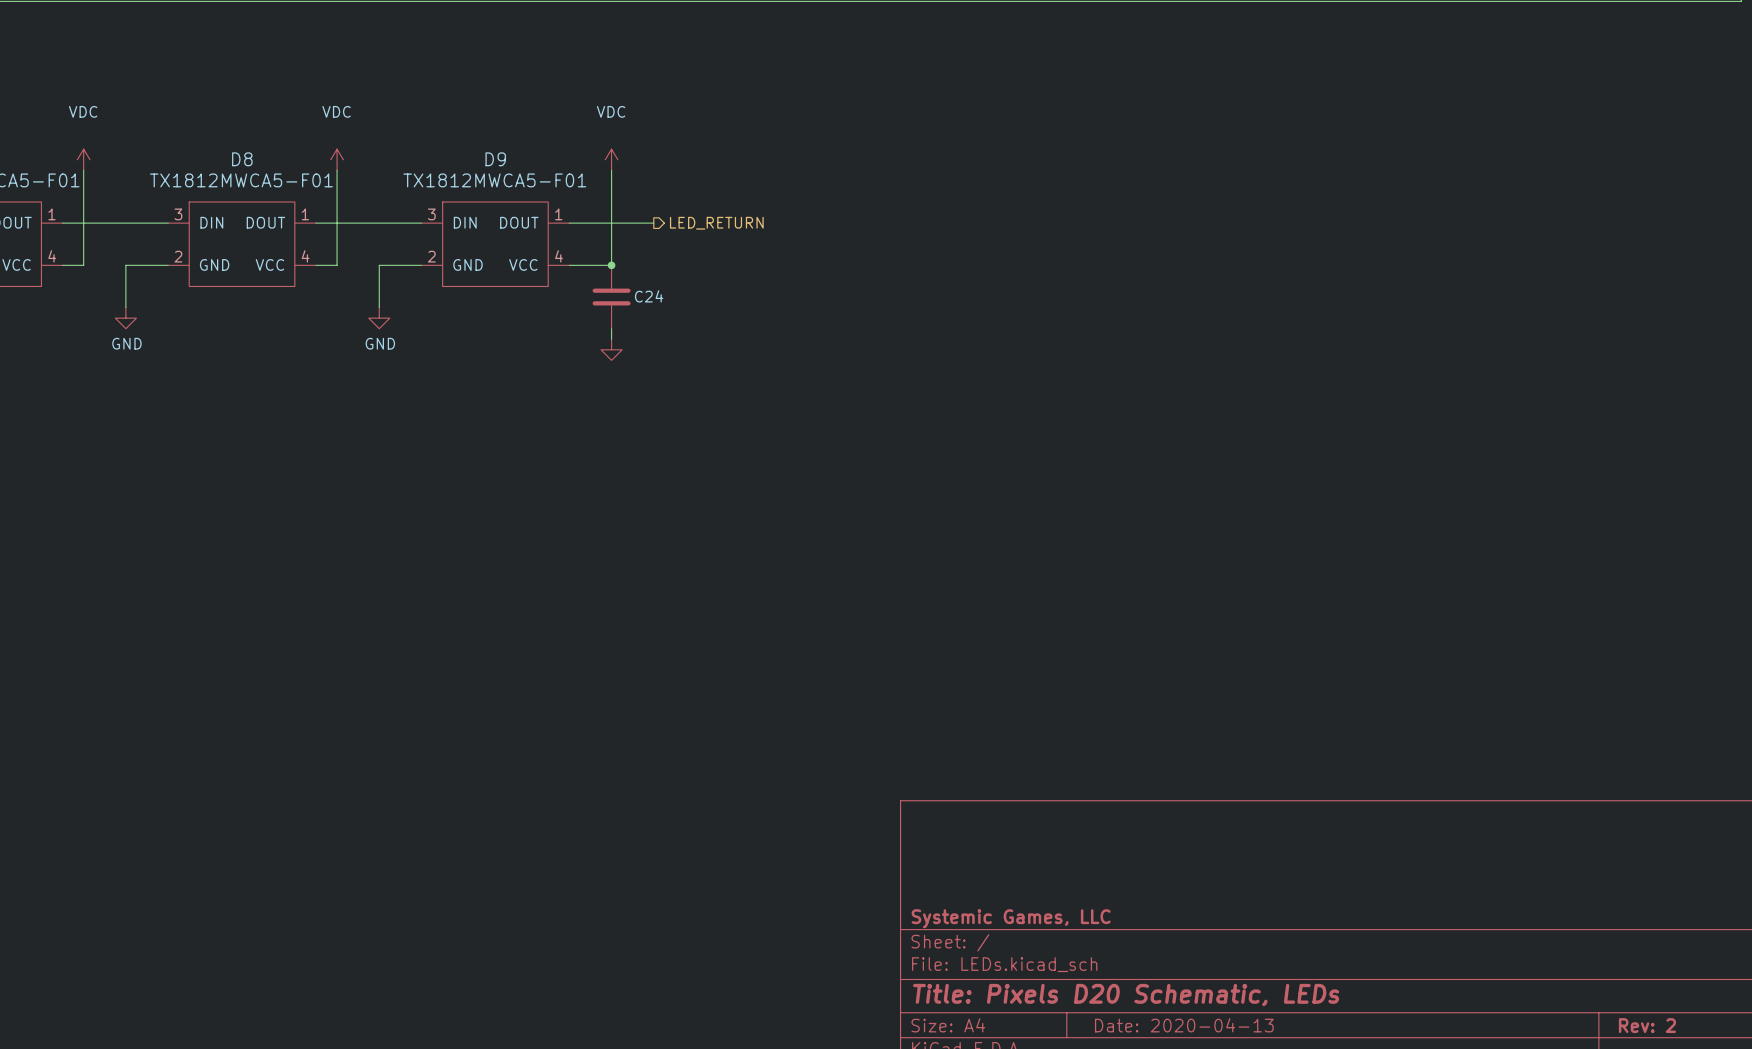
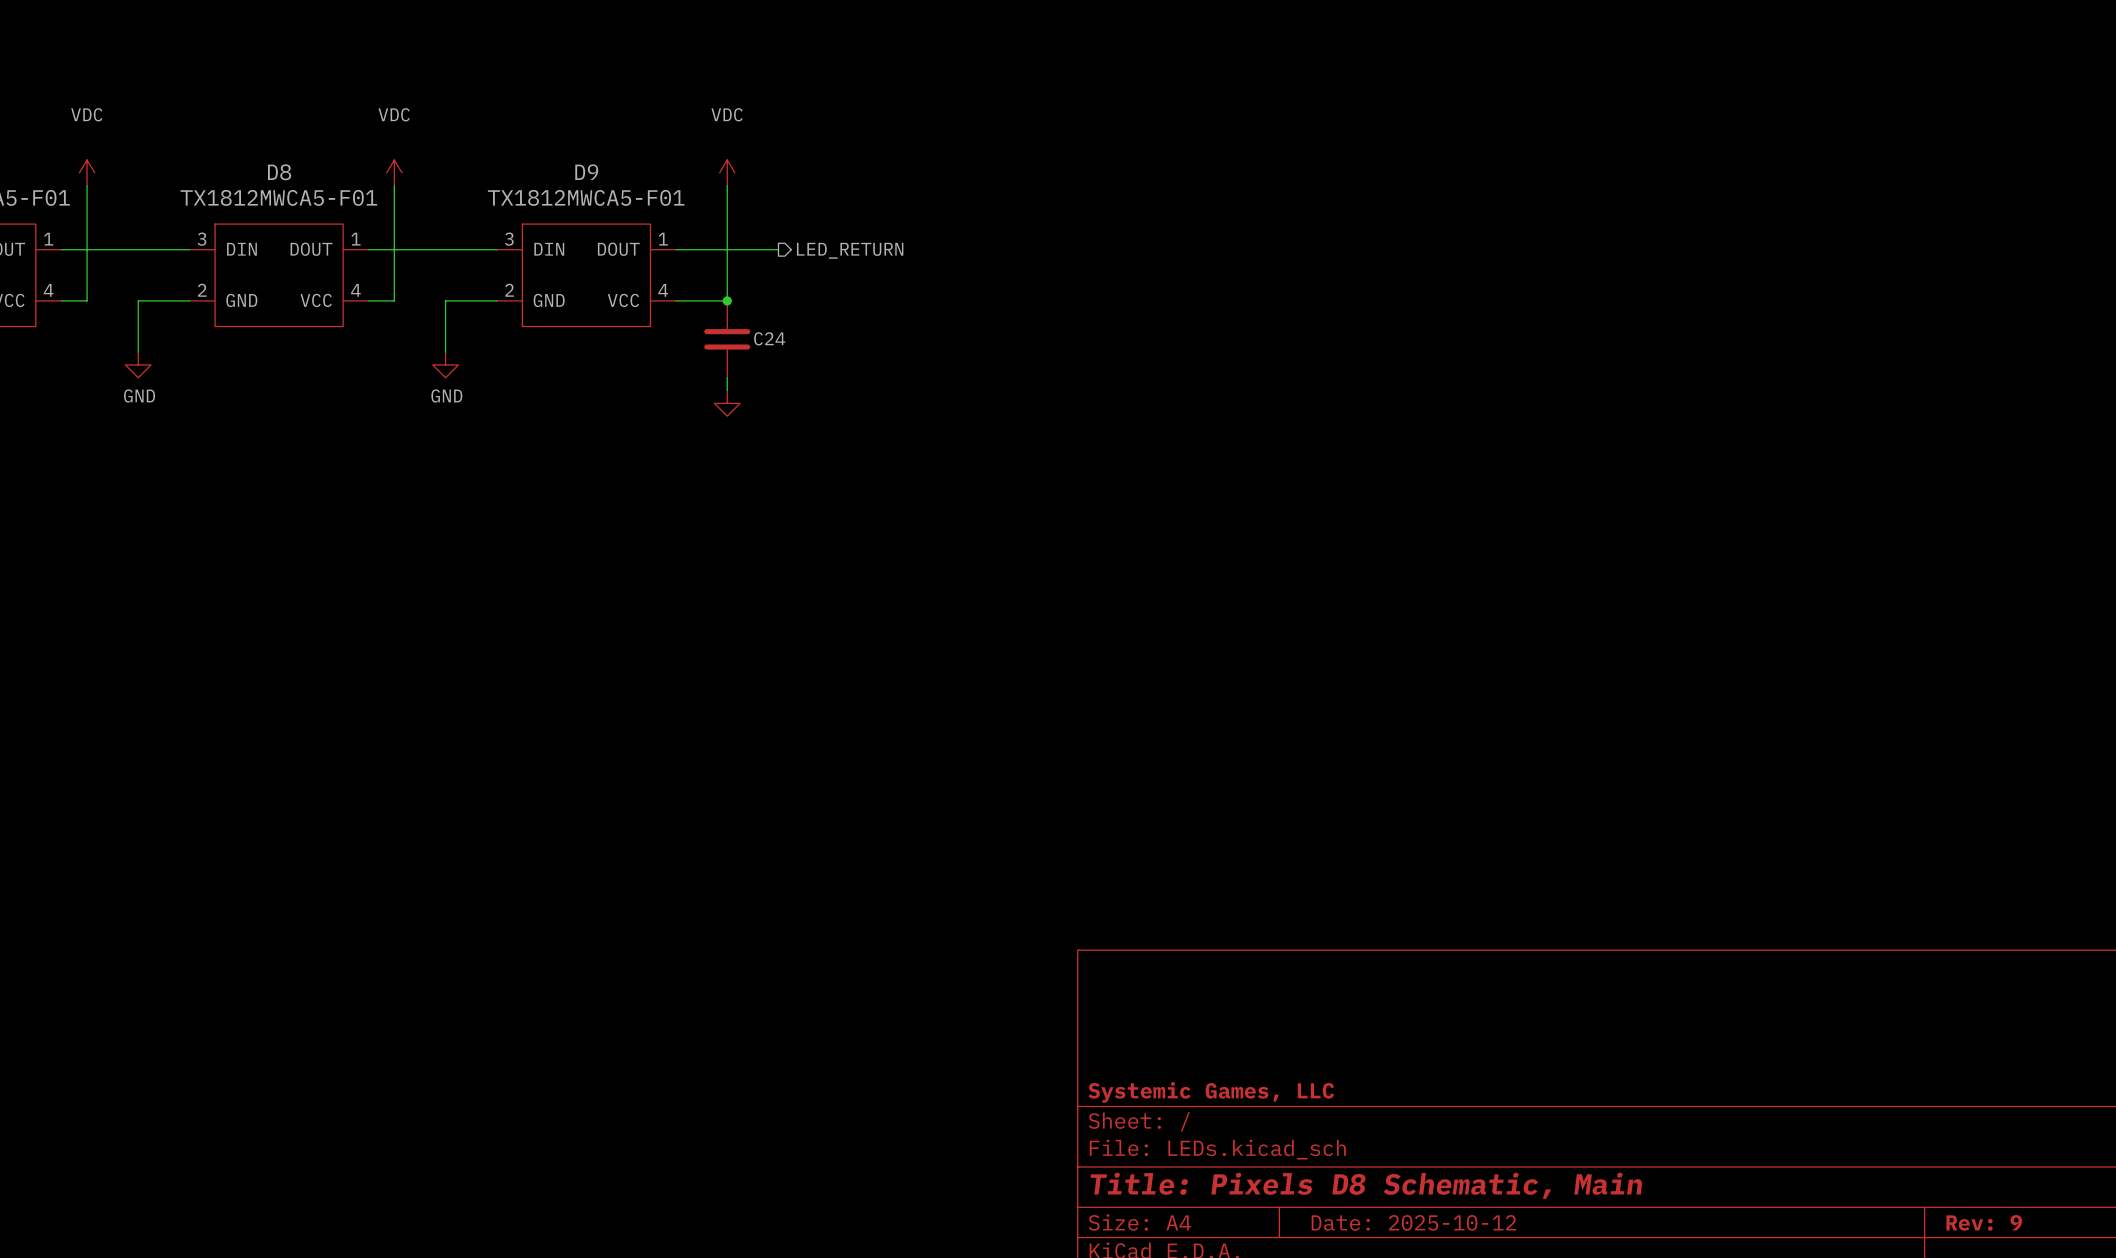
title block: Title: Pixels D20 Schematic, LEDs (1126, 995) -> Title: Pixels D8 Schematic, Main (1366, 1185)
title block: Date: 2020-04-13 (1184, 1025) -> Date: 2025-10-12 (1413, 1222)
title block: Rev: 2 (1647, 1025) -> Rev: 9 (1984, 1222)

